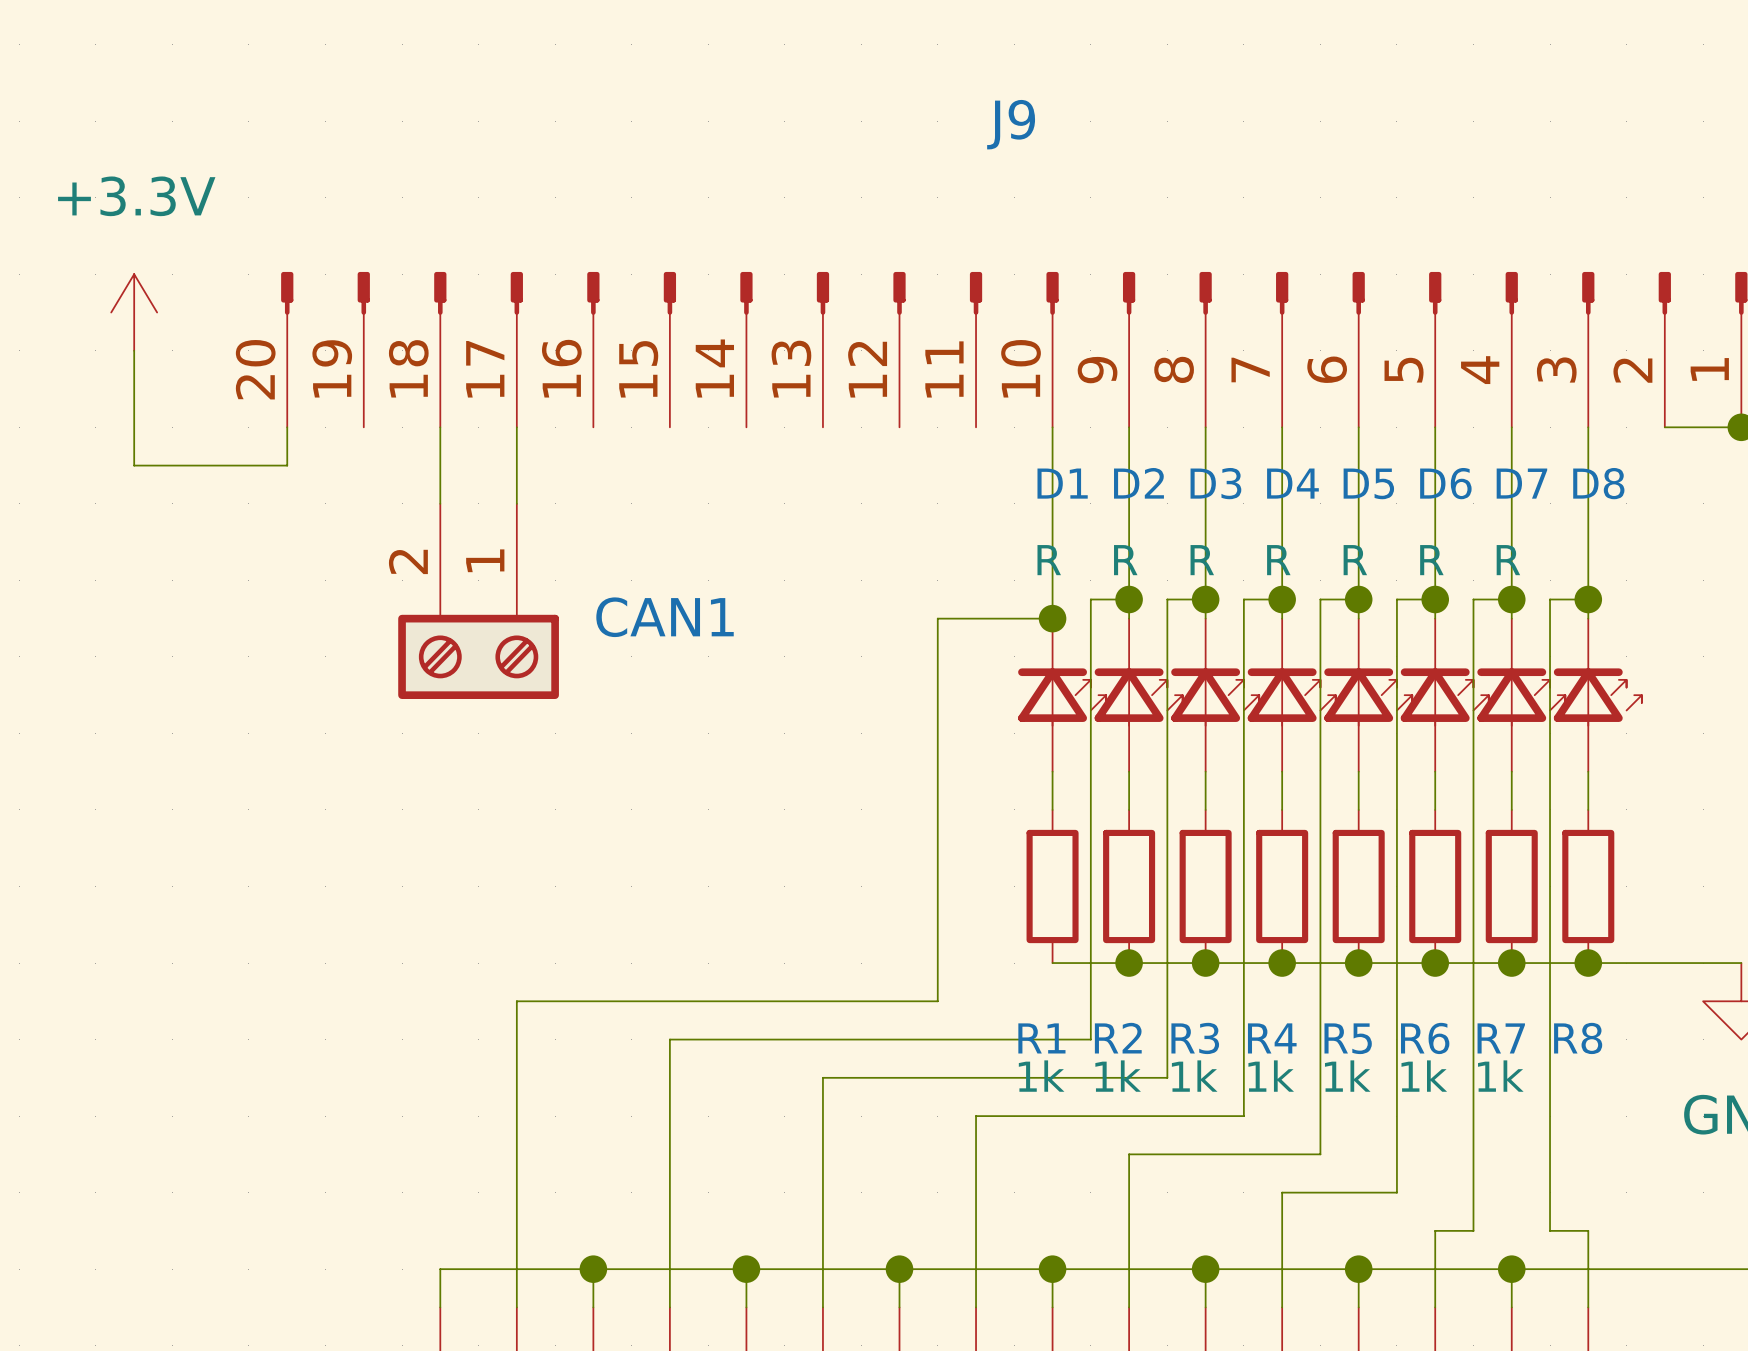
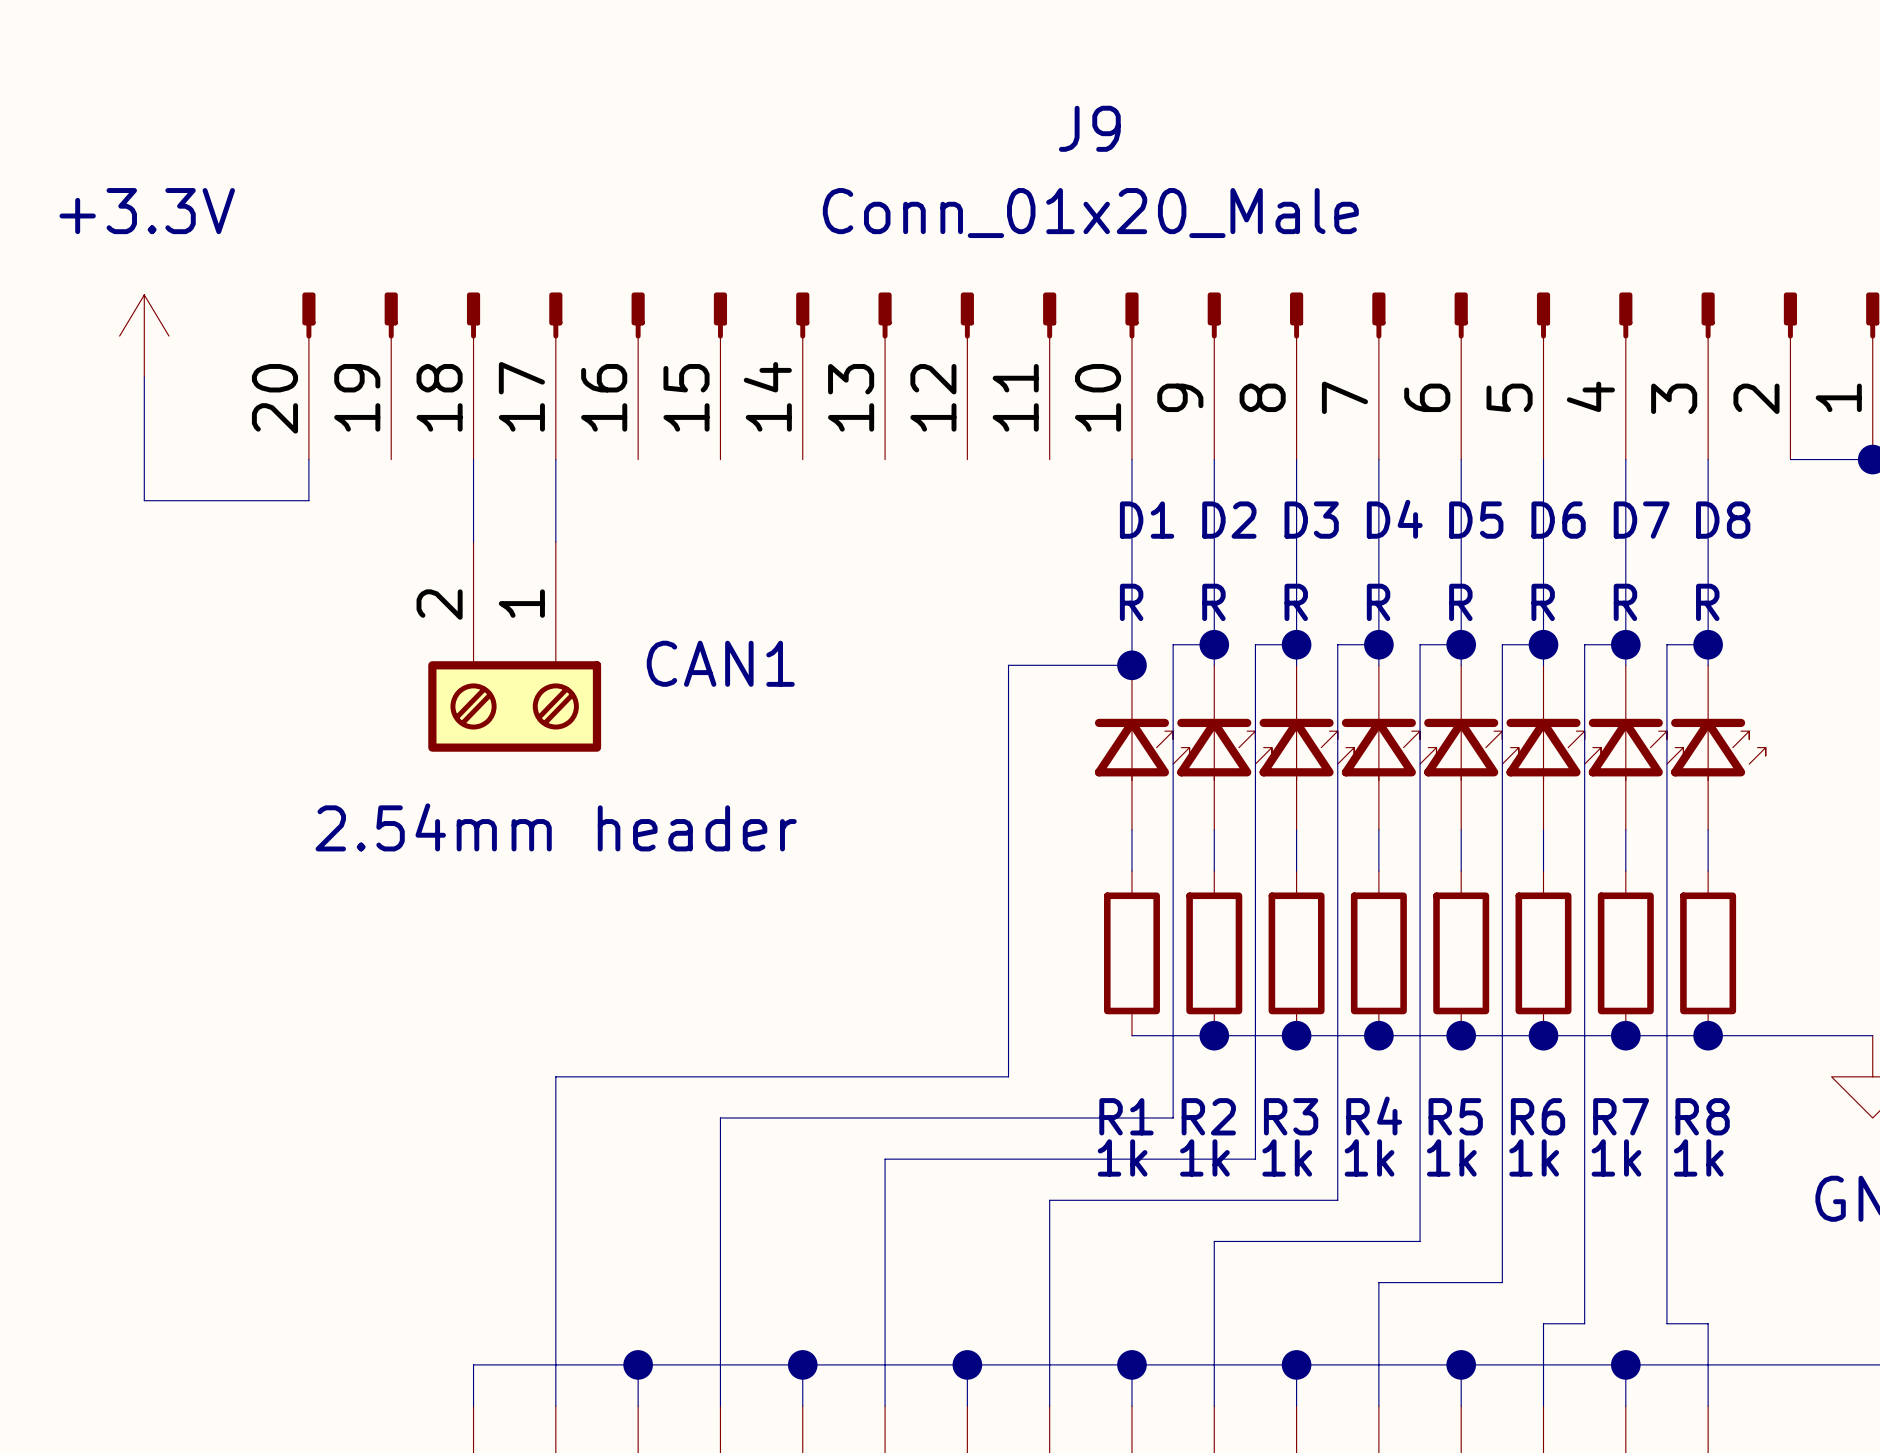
J9 value: none -> Conn_01x20_Male (1090, 213)
D8 value: none -> R (1707, 602)
CAN1 value: none -> 2.54mm header (556, 827)
R8 value: none -> 1k (1698, 1157)

